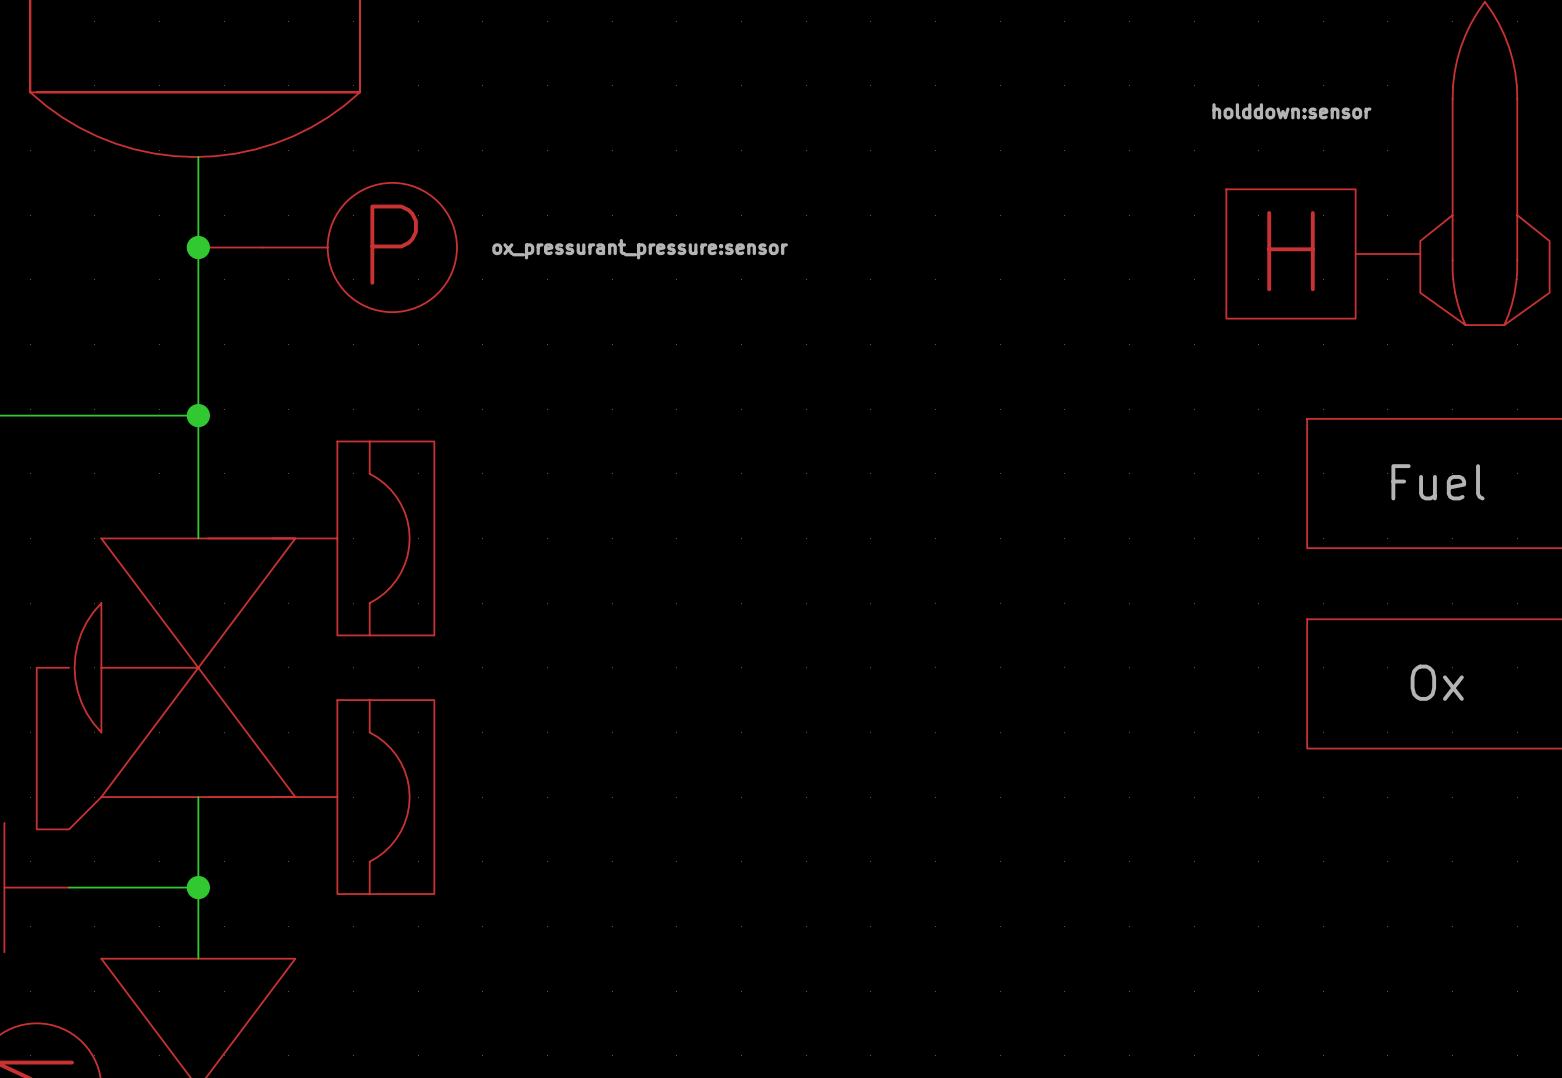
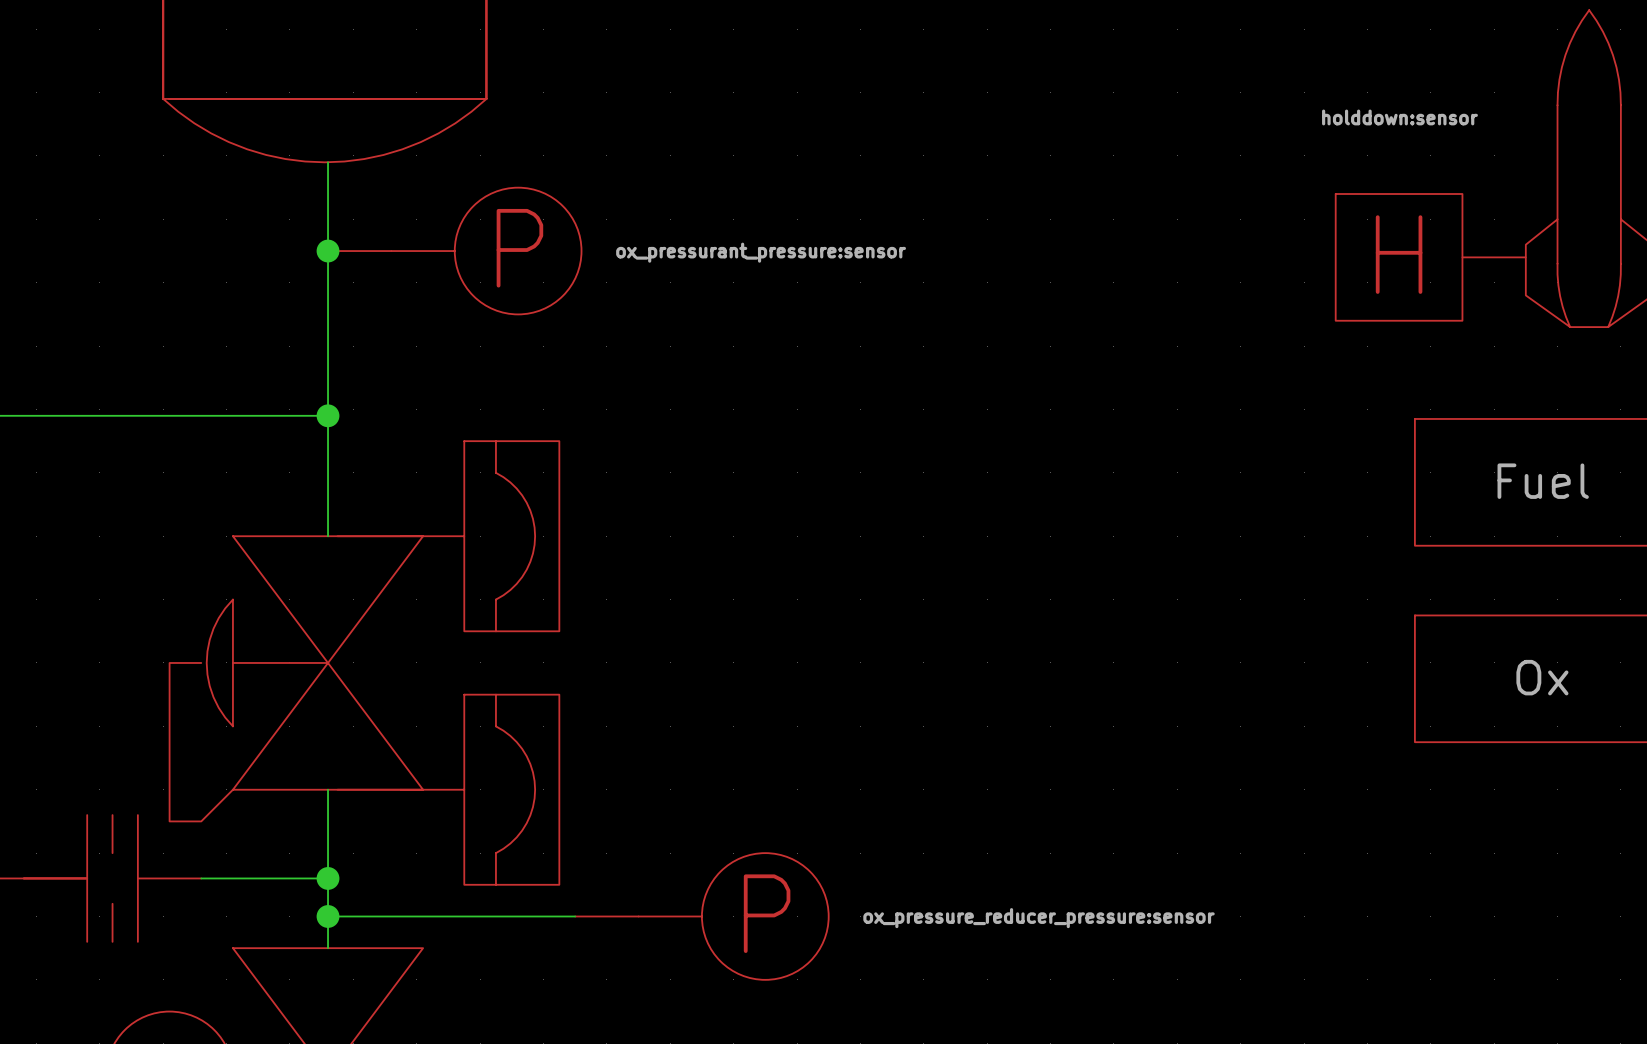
wire: none -> (328, 916) (575, 916)
junction: none -> (328, 916)
part: none -> ox_pressure_reducer_pressure:sensor (701, 916)

